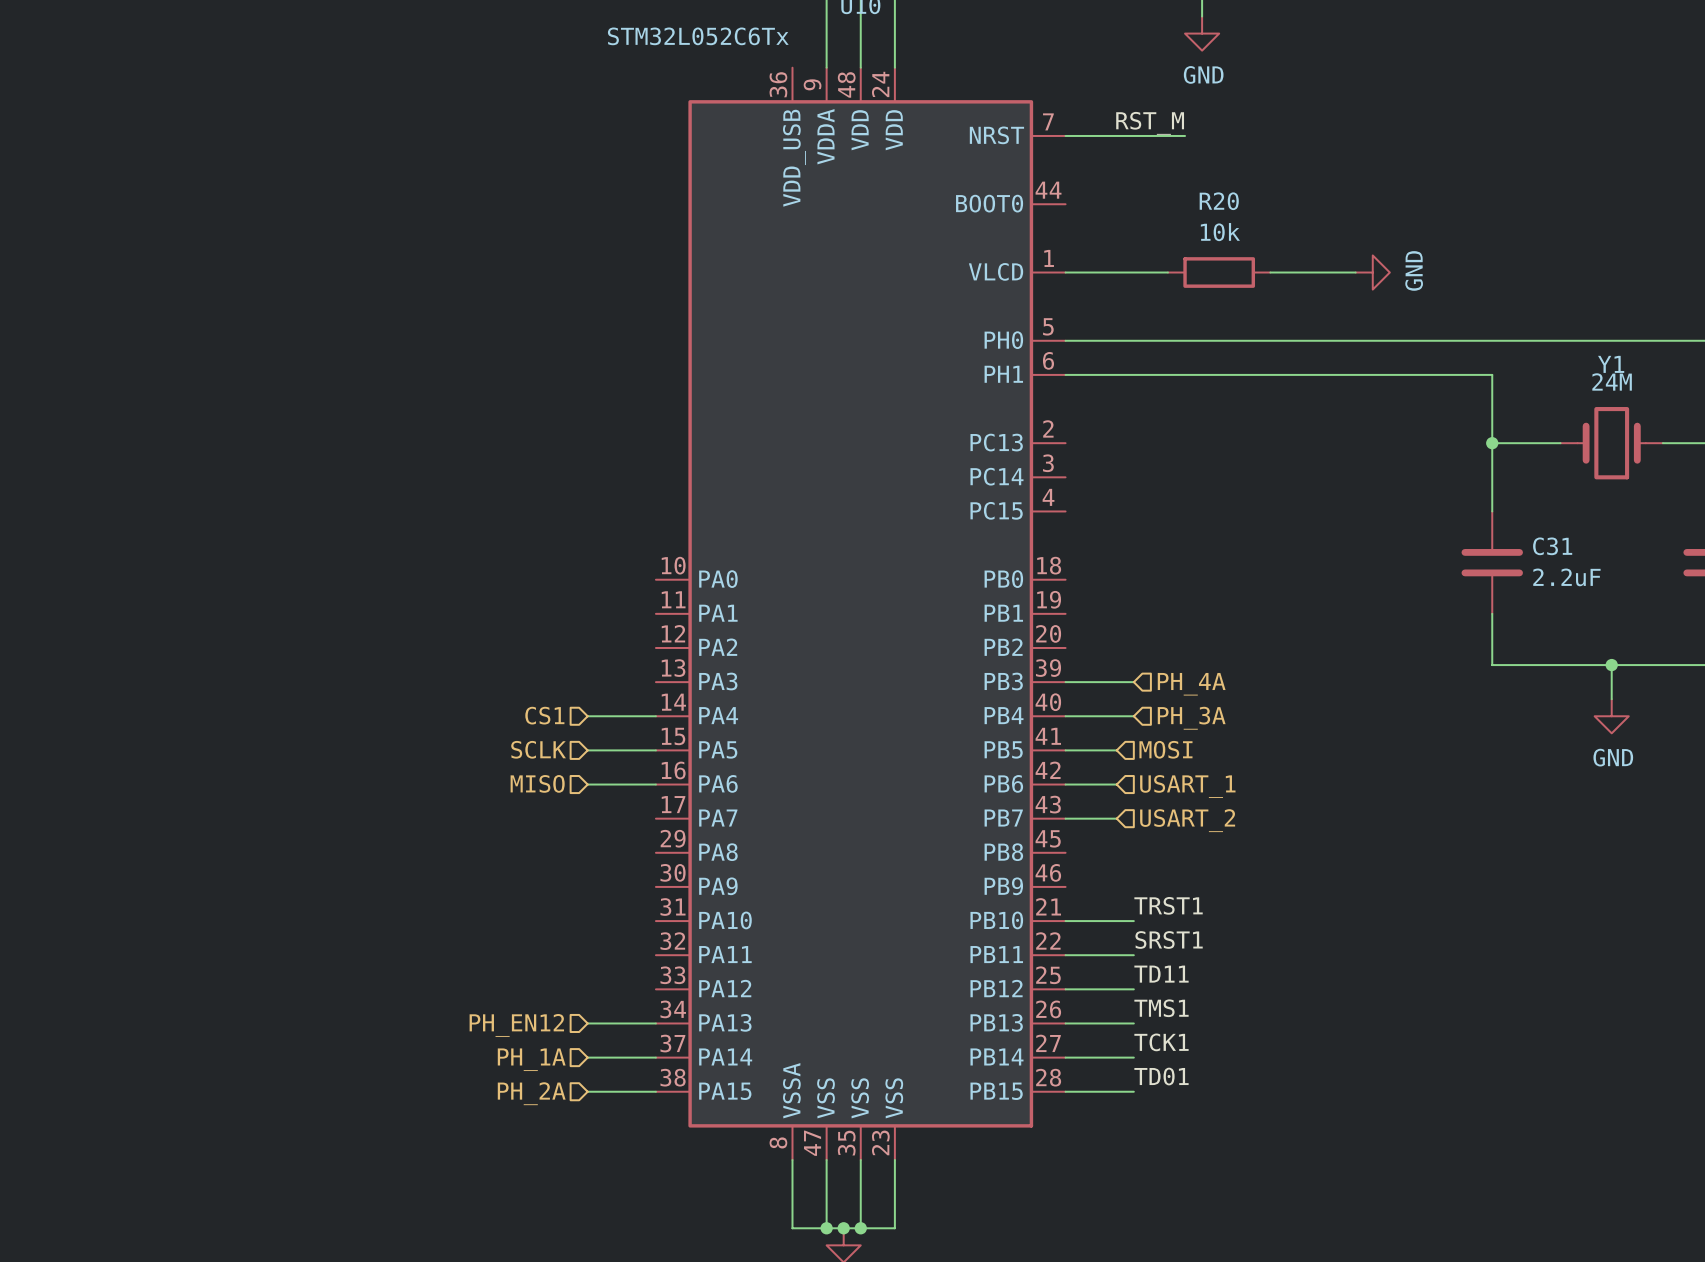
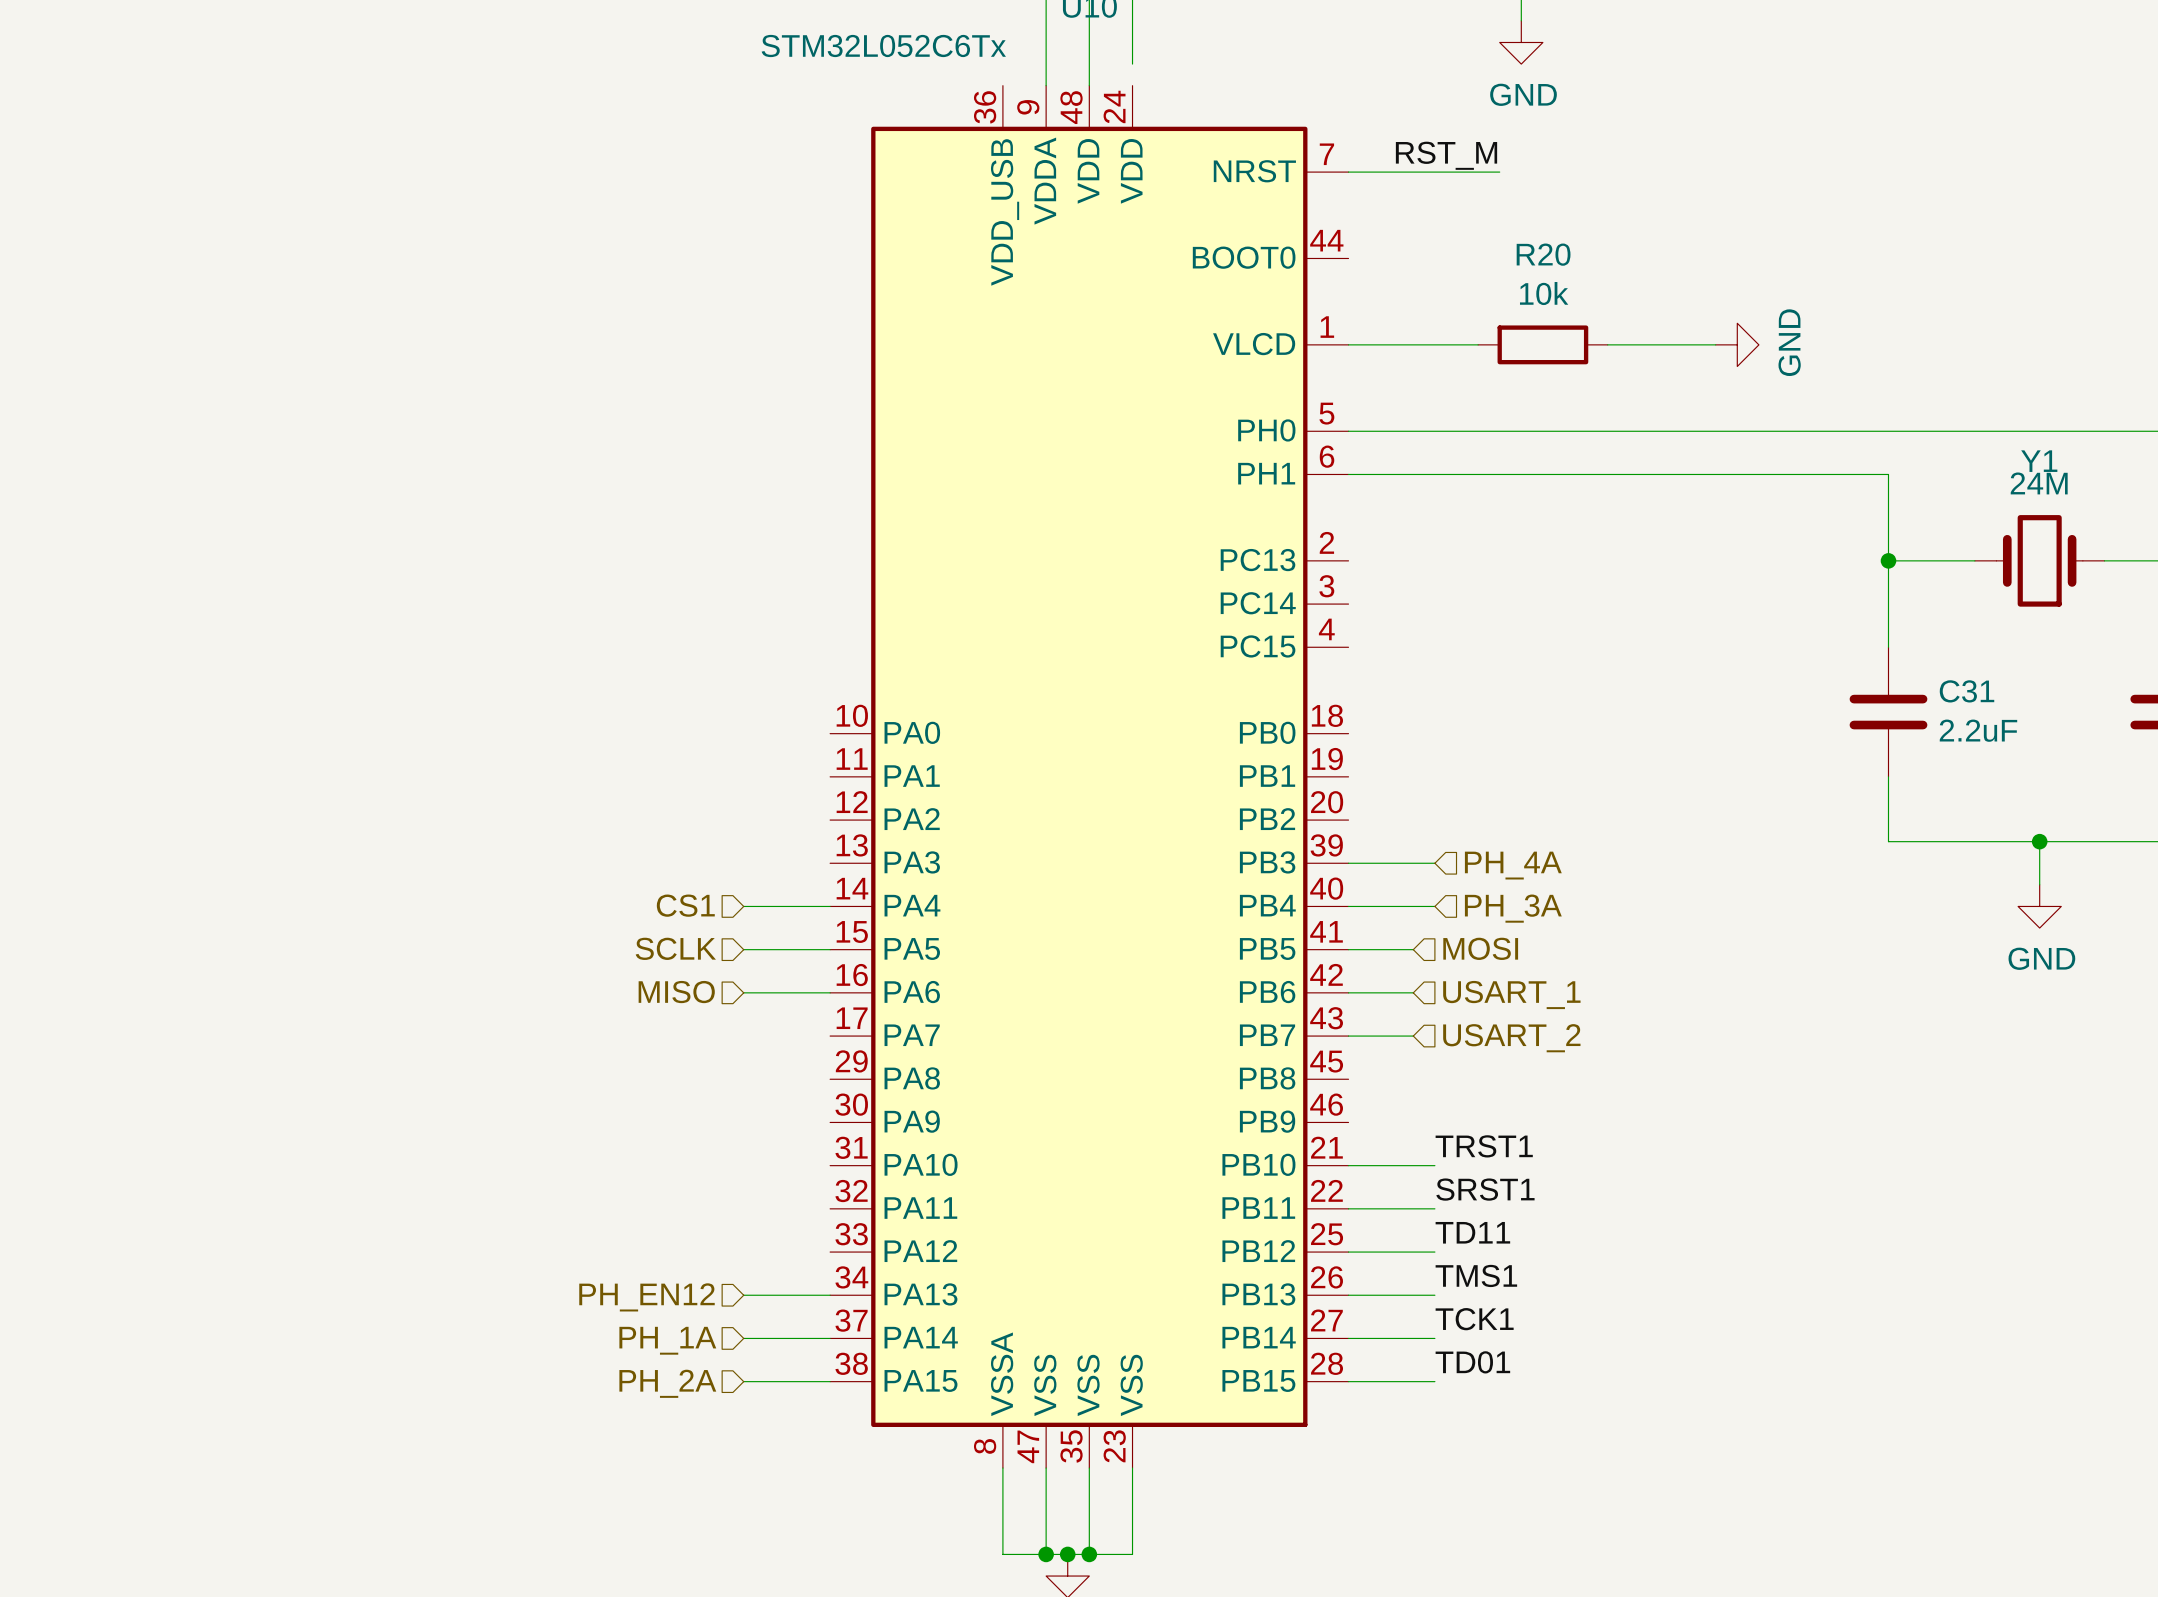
wire: (894, 50) (894, 67) -> none

